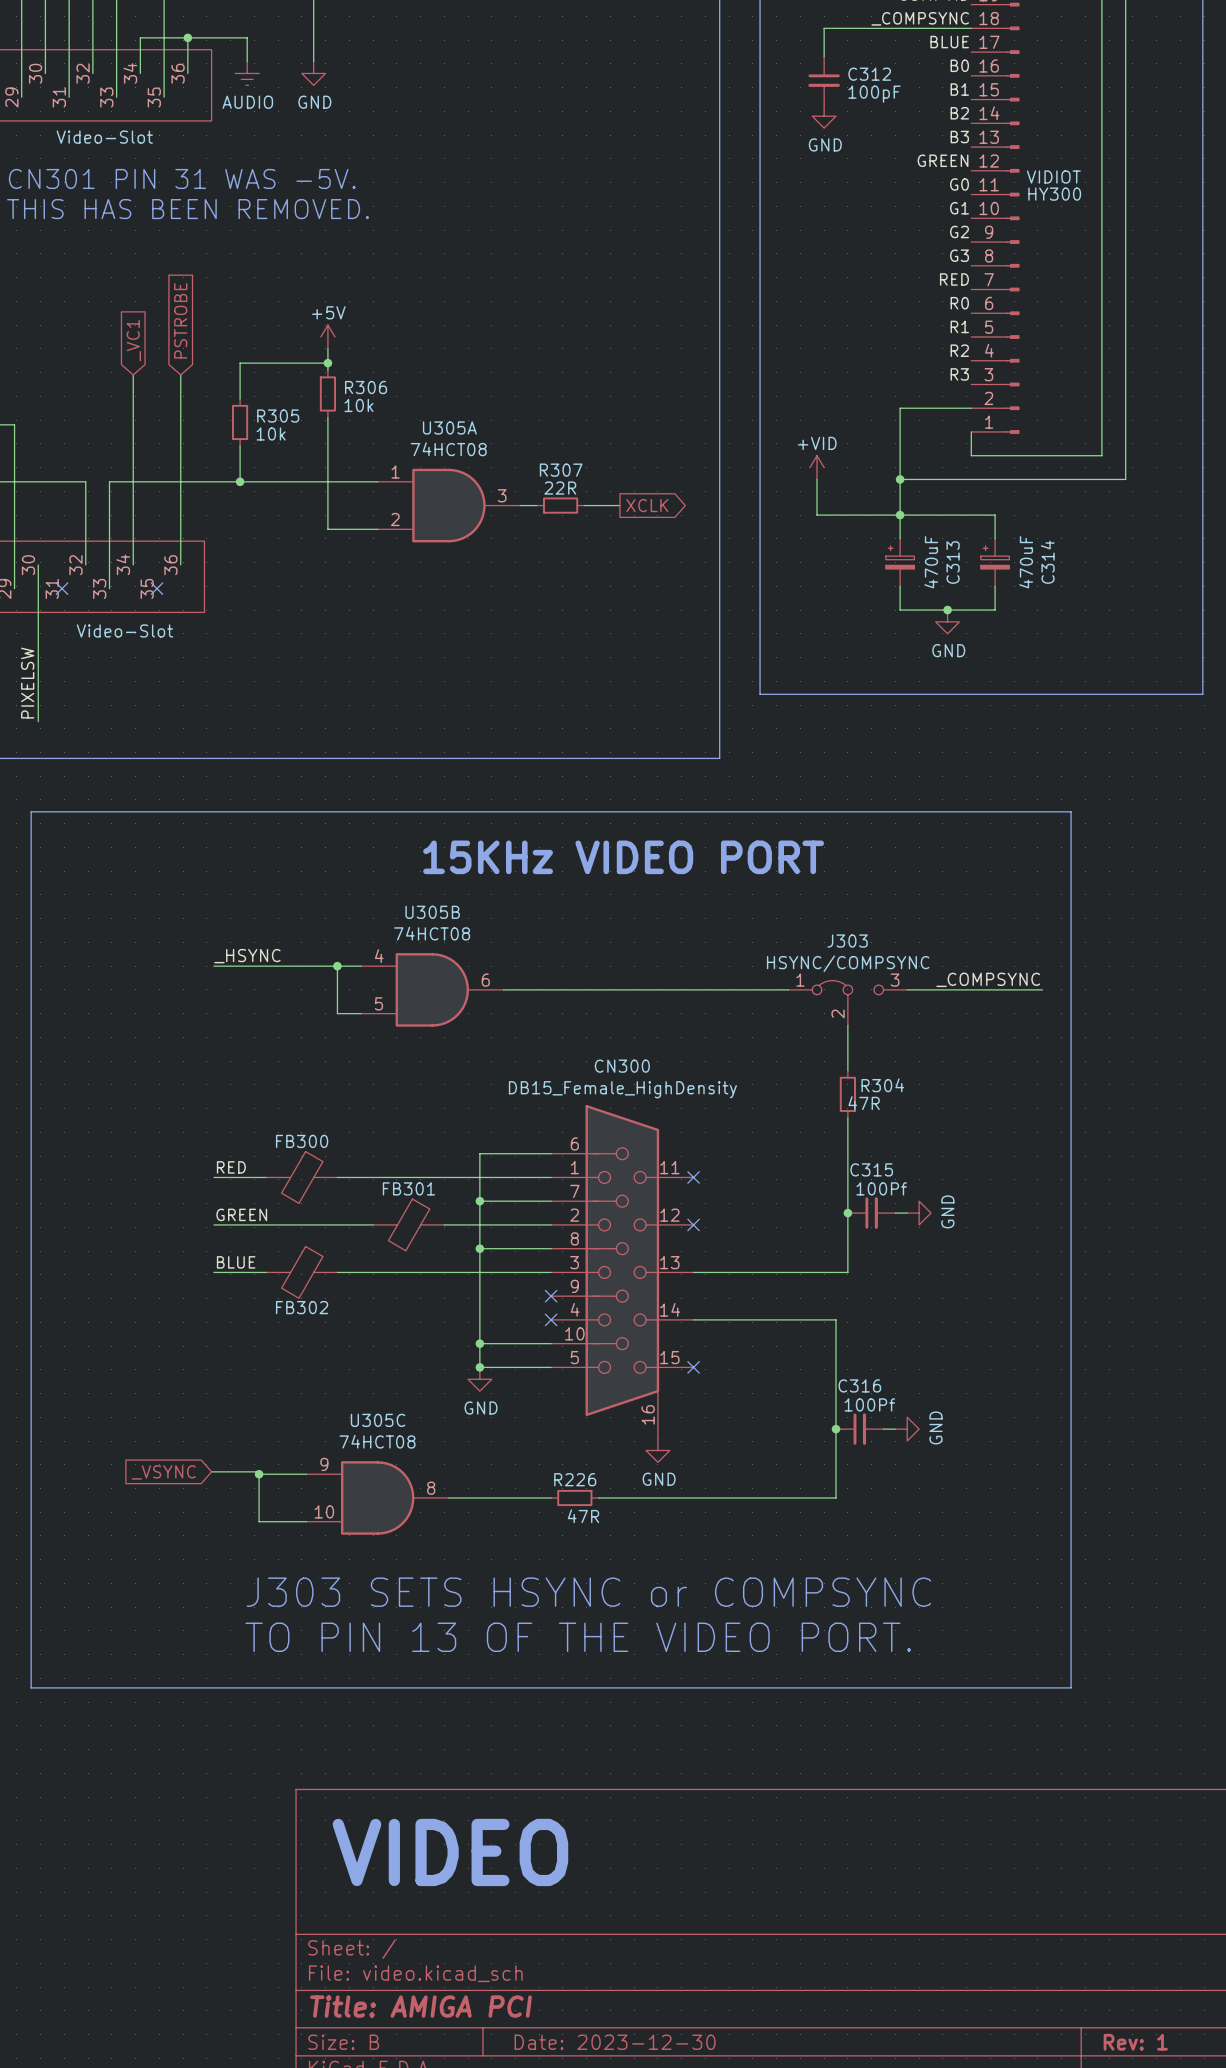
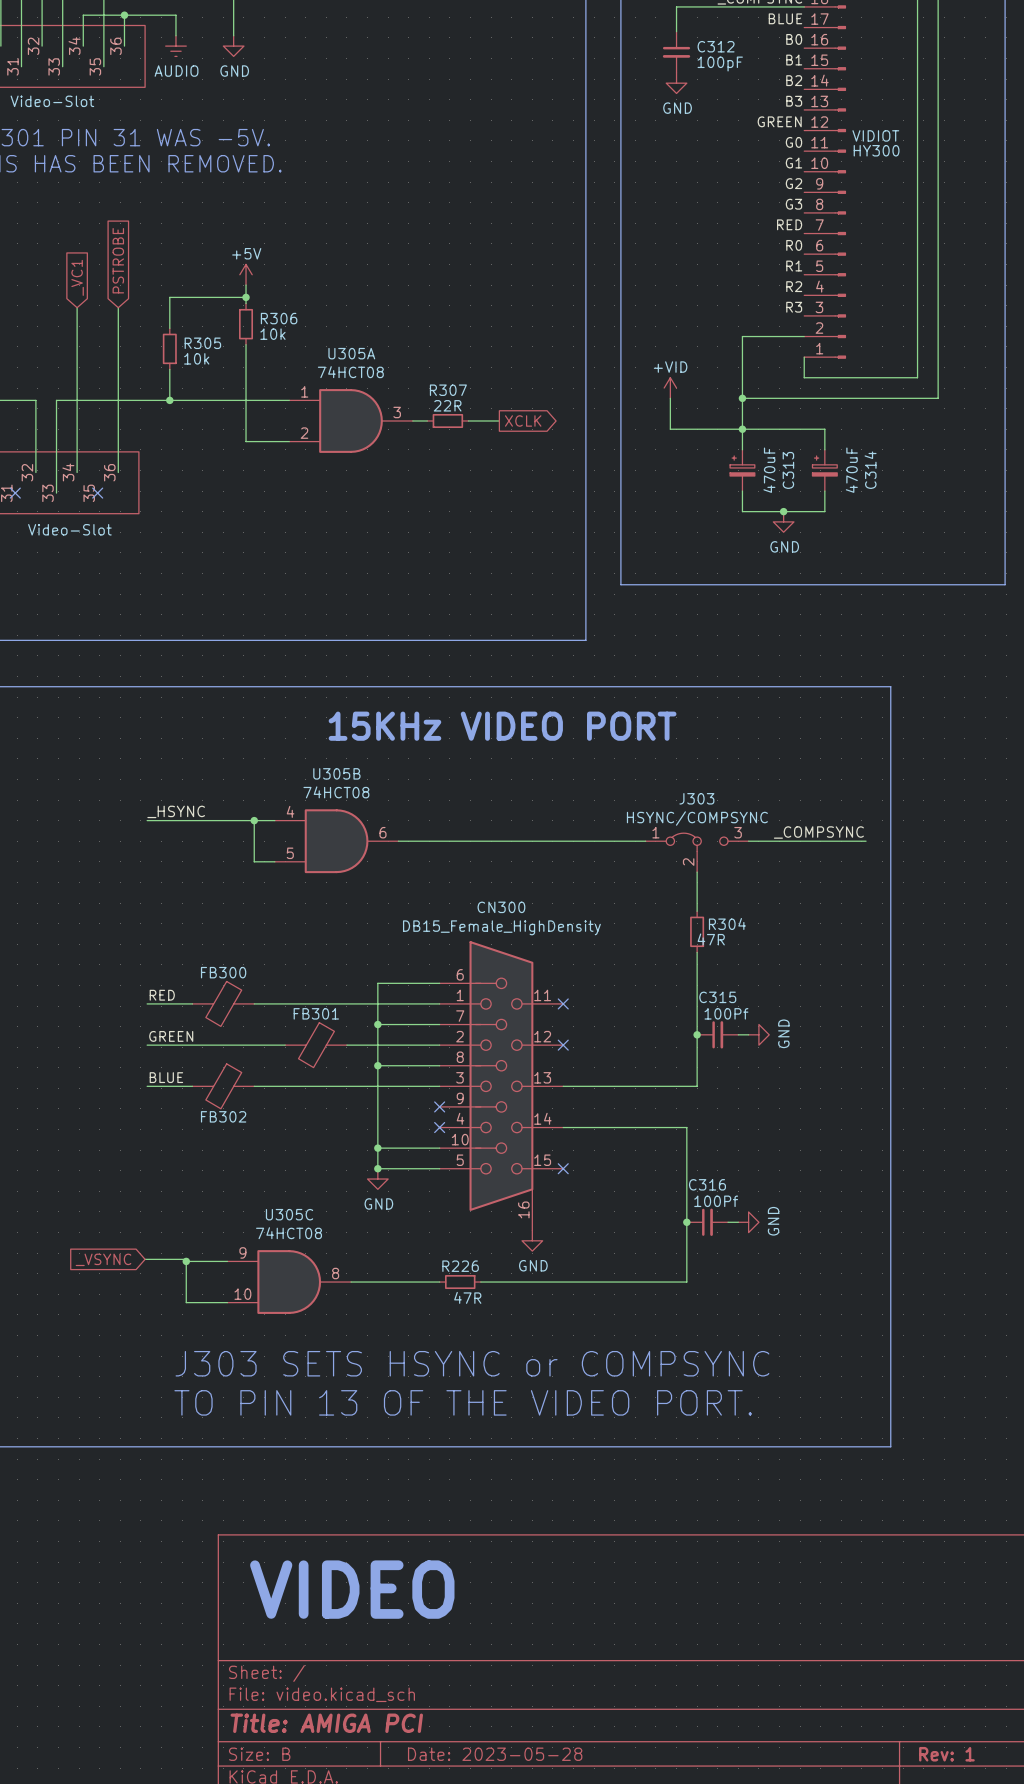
title block: Date: 2023-12-30 (615, 2042) -> Date: 2023-05-28 (495, 1754)

